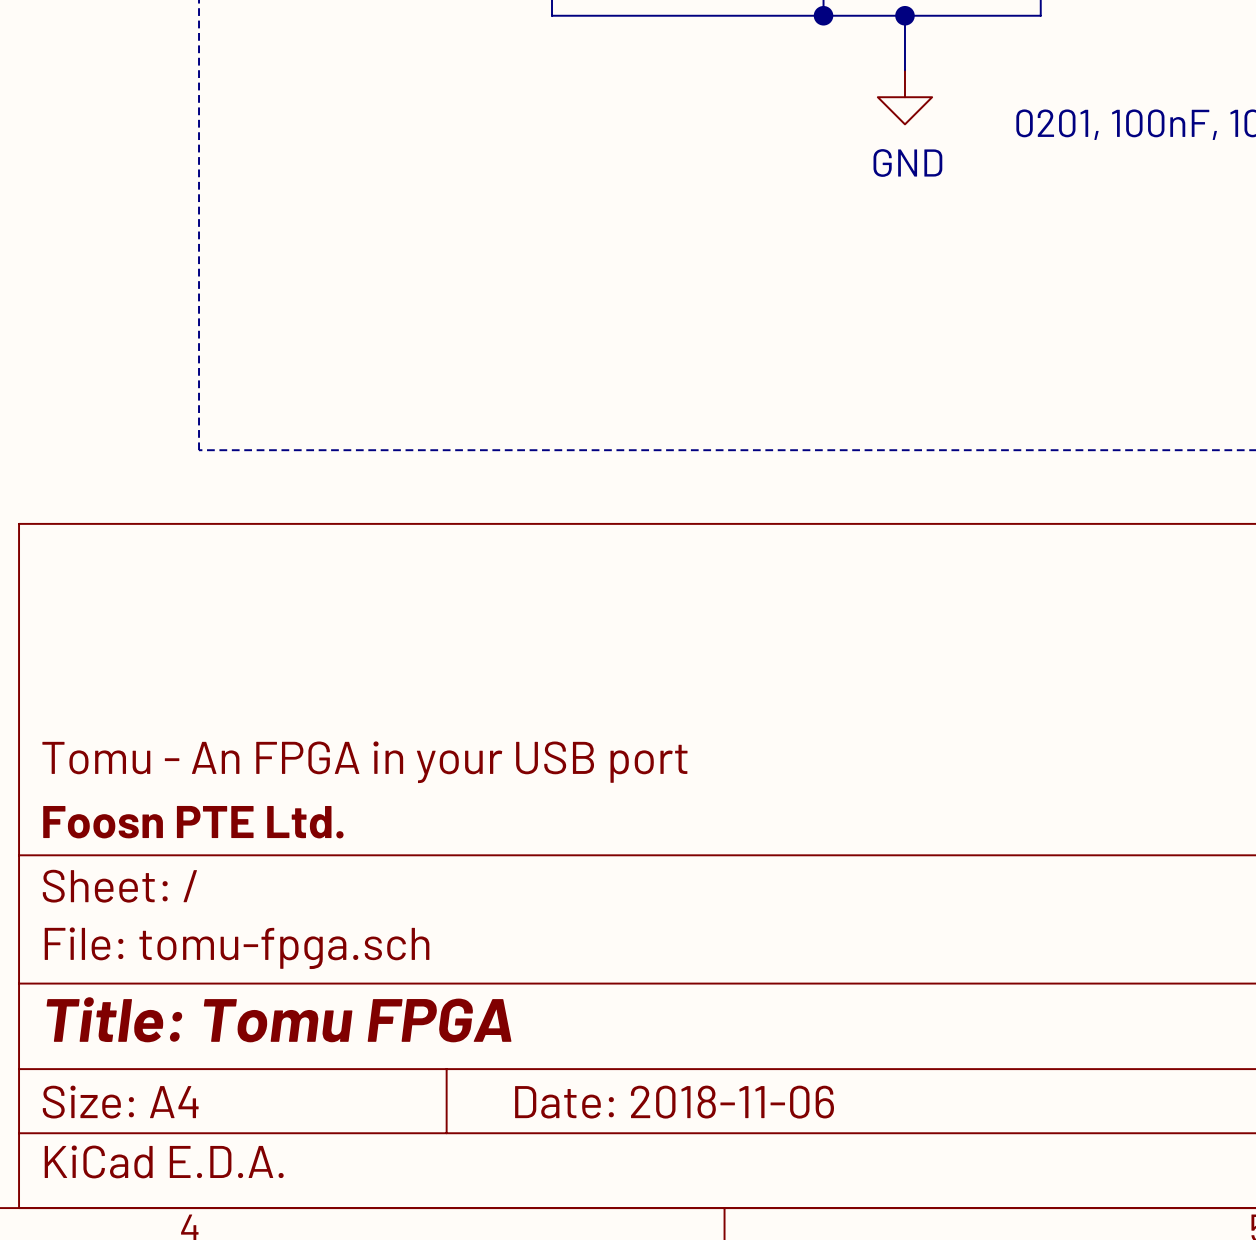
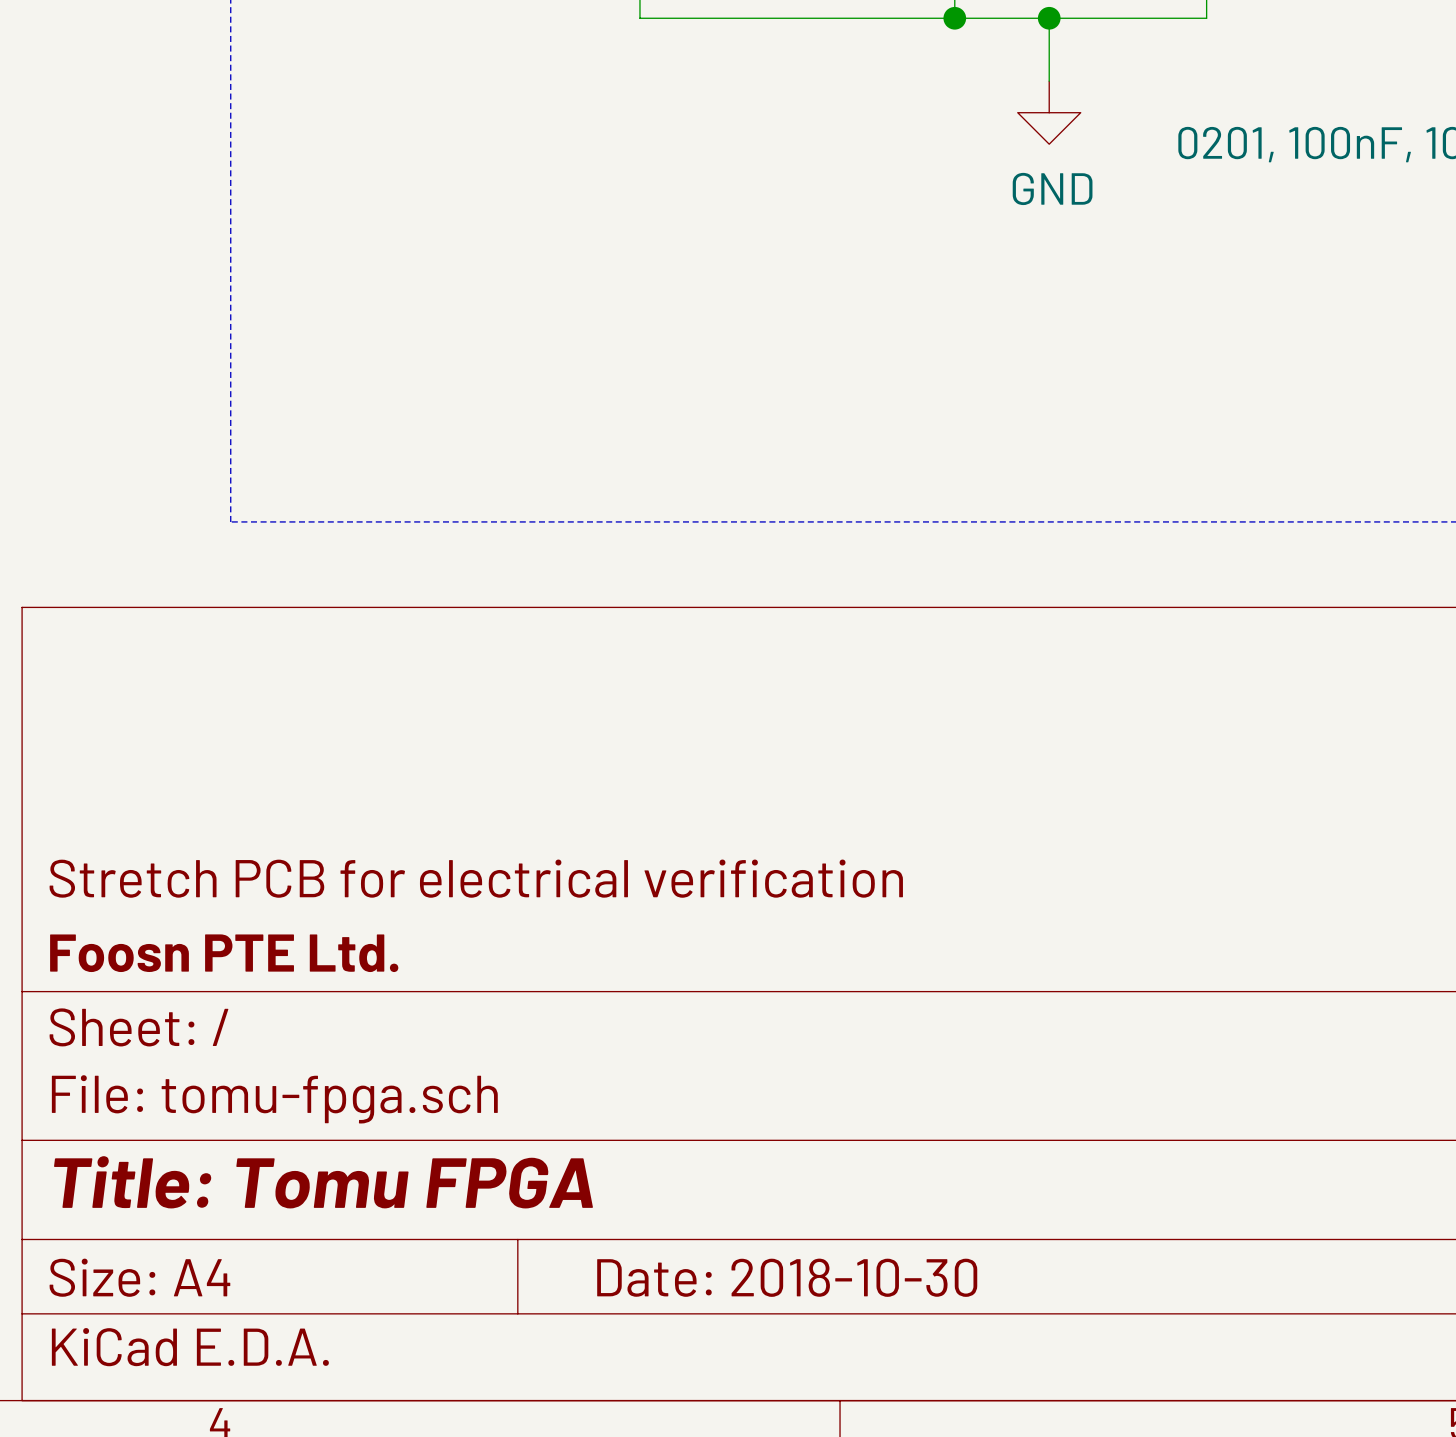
title block: Tomu - An FPGA in your USB port (364, 762) -> Stretch PCB for electrical verification (476, 878)
title block: Date: 2018-11-06 (674, 1102) -> Date: 2018-10-30 (787, 1277)

